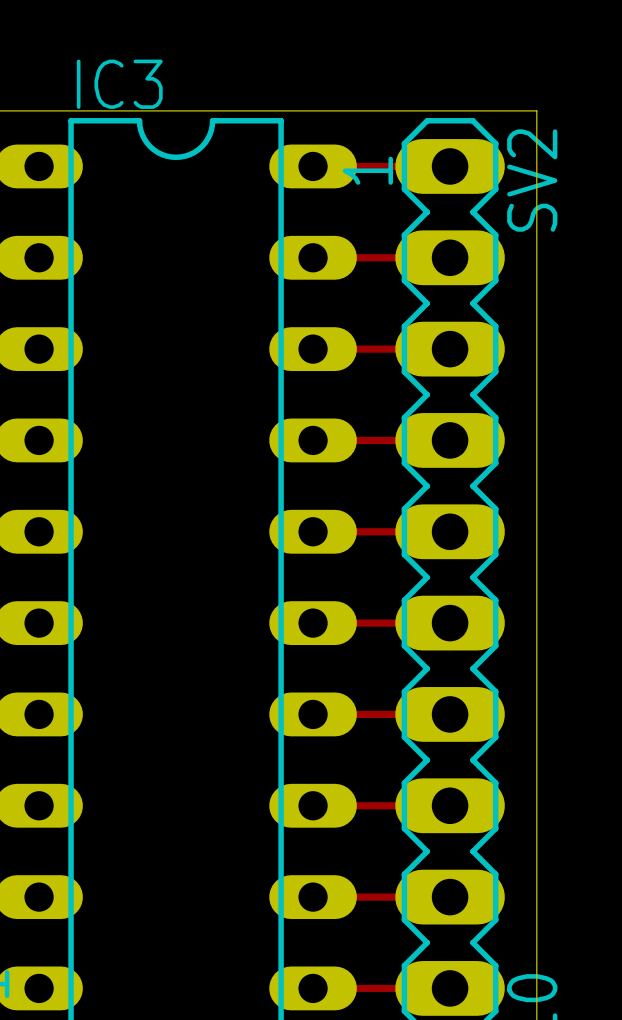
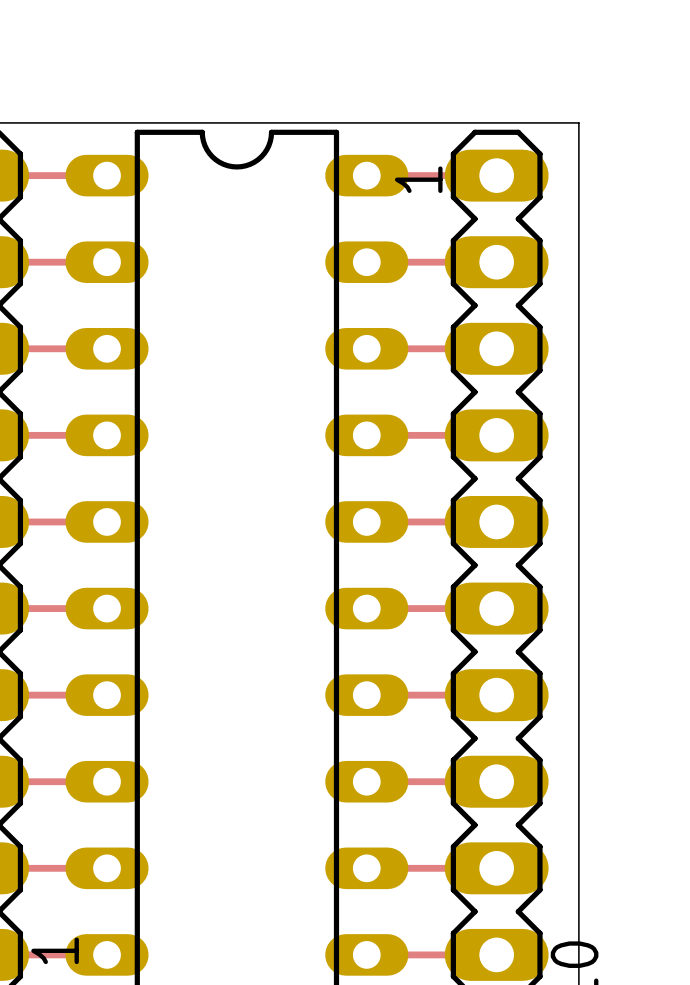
IC3 name: IC3 (119, 84) -> none
SV2 name: SV2 (532, 180) -> none

